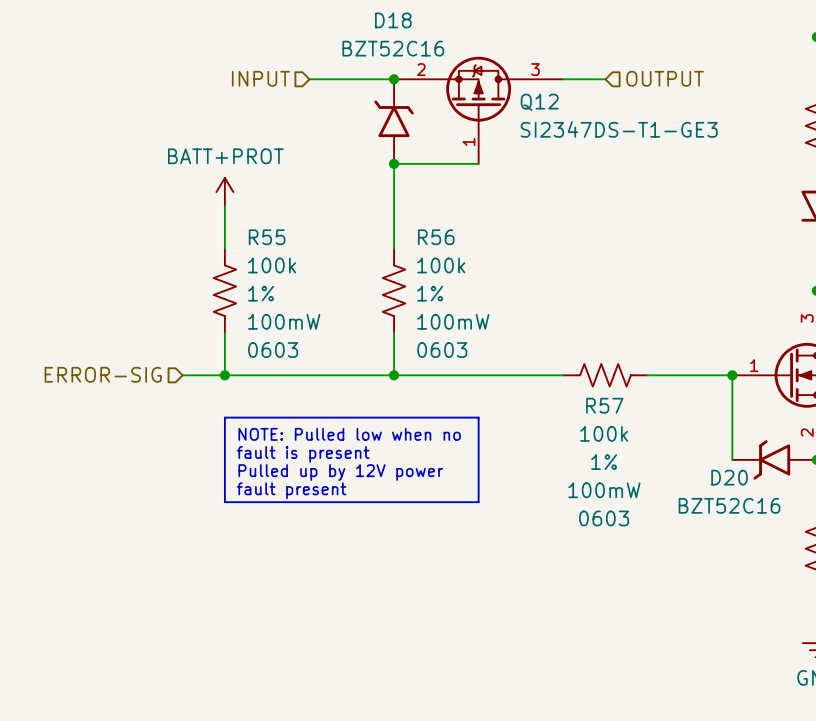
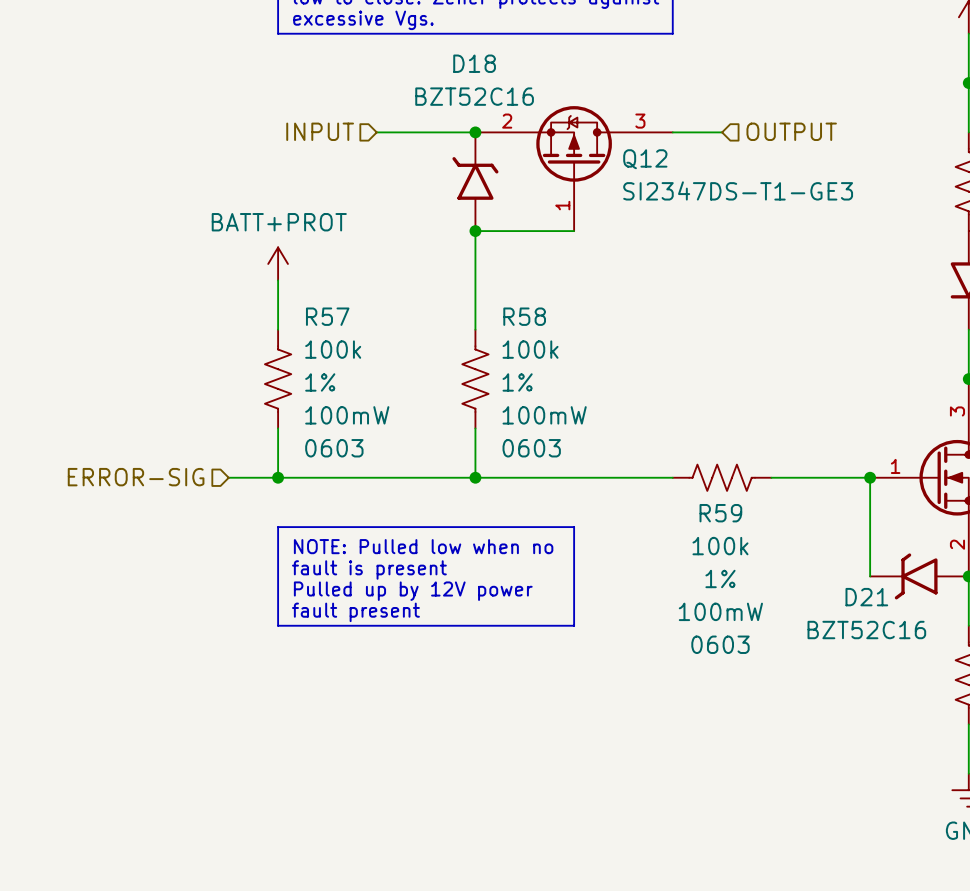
R55 name: R55 (267, 237) -> R57 (327, 316)
R56 name: R56 (436, 237) -> R58 (524, 316)
R57 name: R57 (604, 405) -> R59 (720, 513)
D20 name: D20 (729, 477) -> D21 (866, 597)

